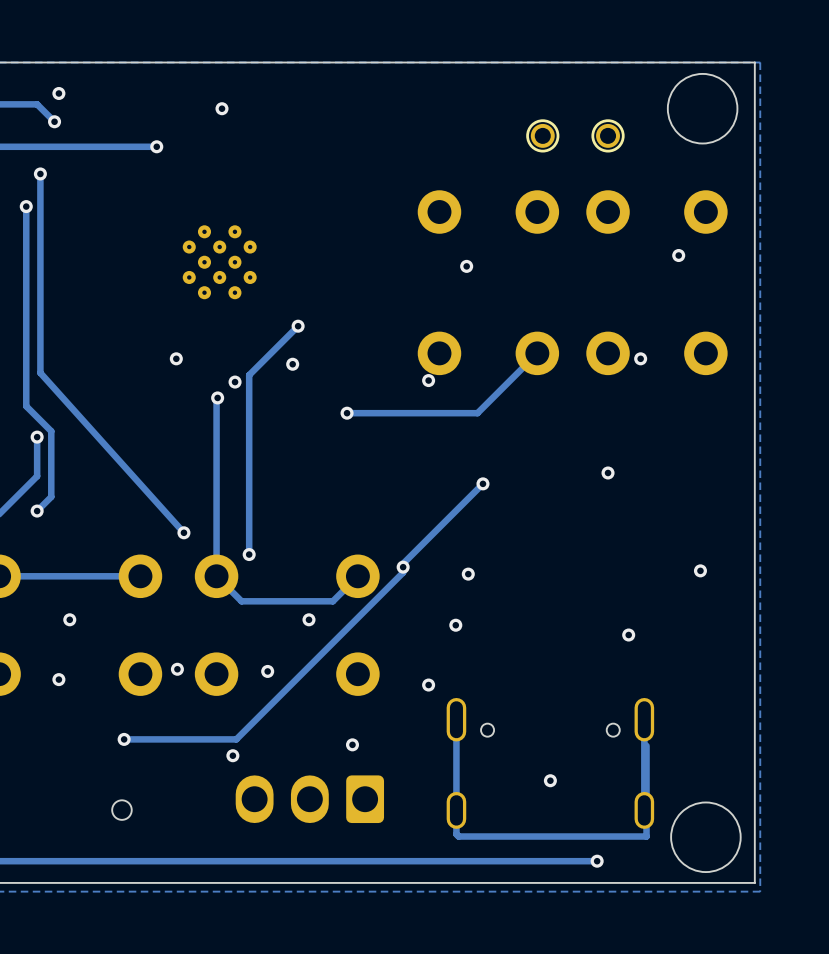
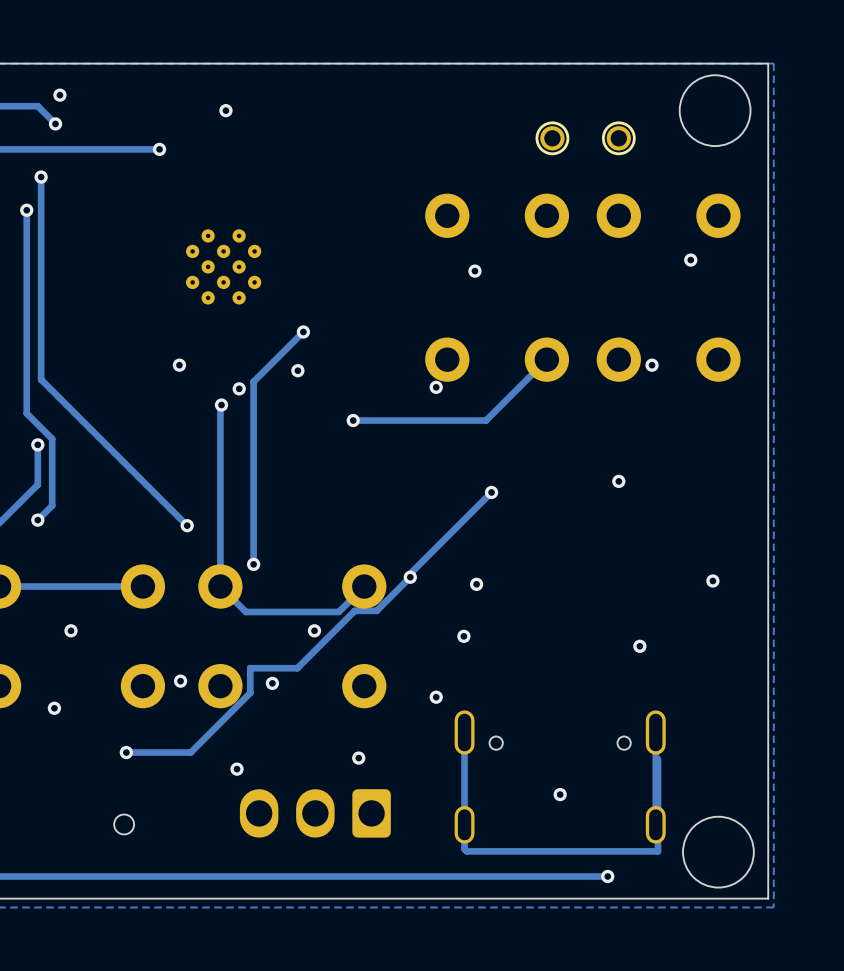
track: (40, 372) (183, 532) -> (41, 379) (187, 525)
via position: (183, 532) -> (187, 525)
track: (403, 567) (403, 572) (236, 739) (187, 739) -> (410, 577) (376, 610) (354, 610) (297, 668) (250, 668) (250, 692) (190, 752)
via position: (58, 679) -> (54, 708)

